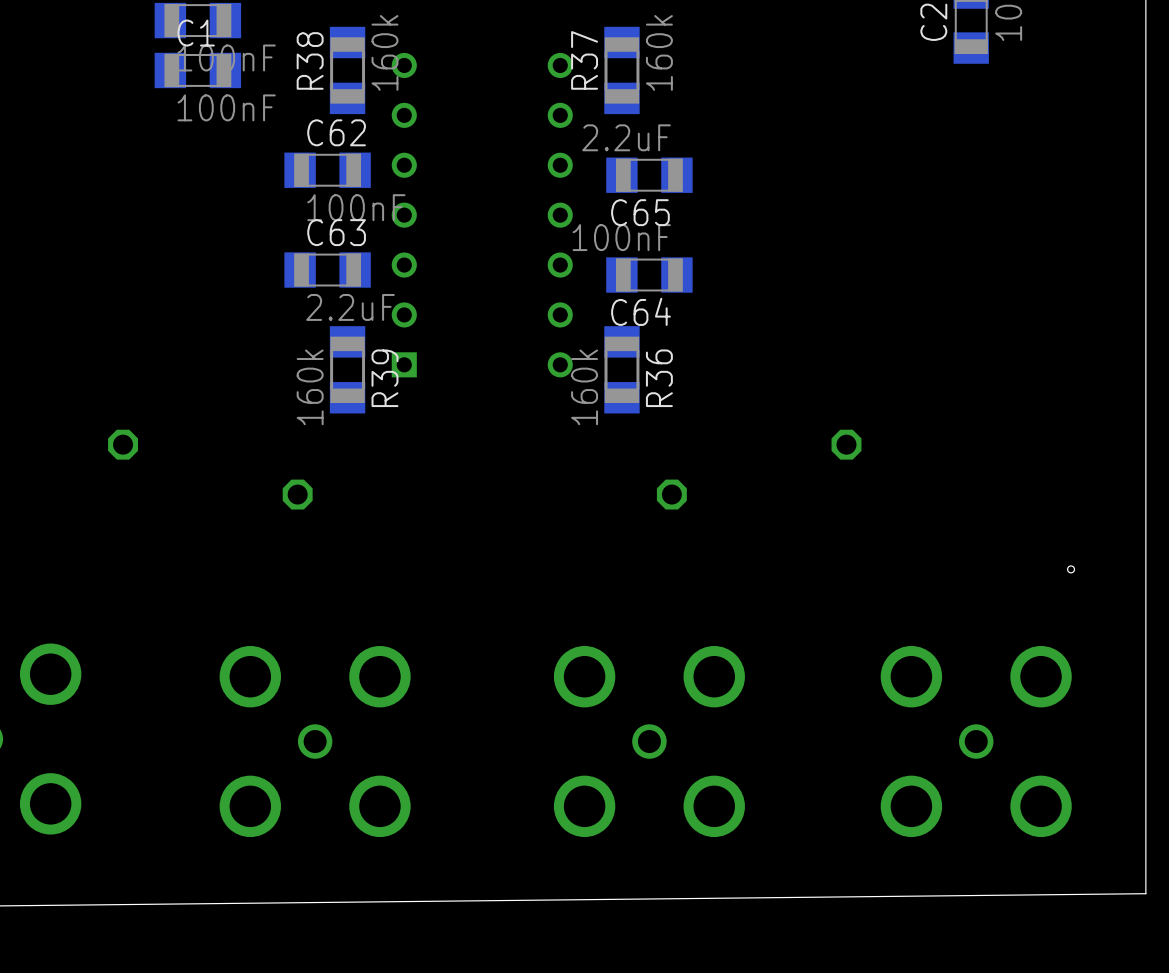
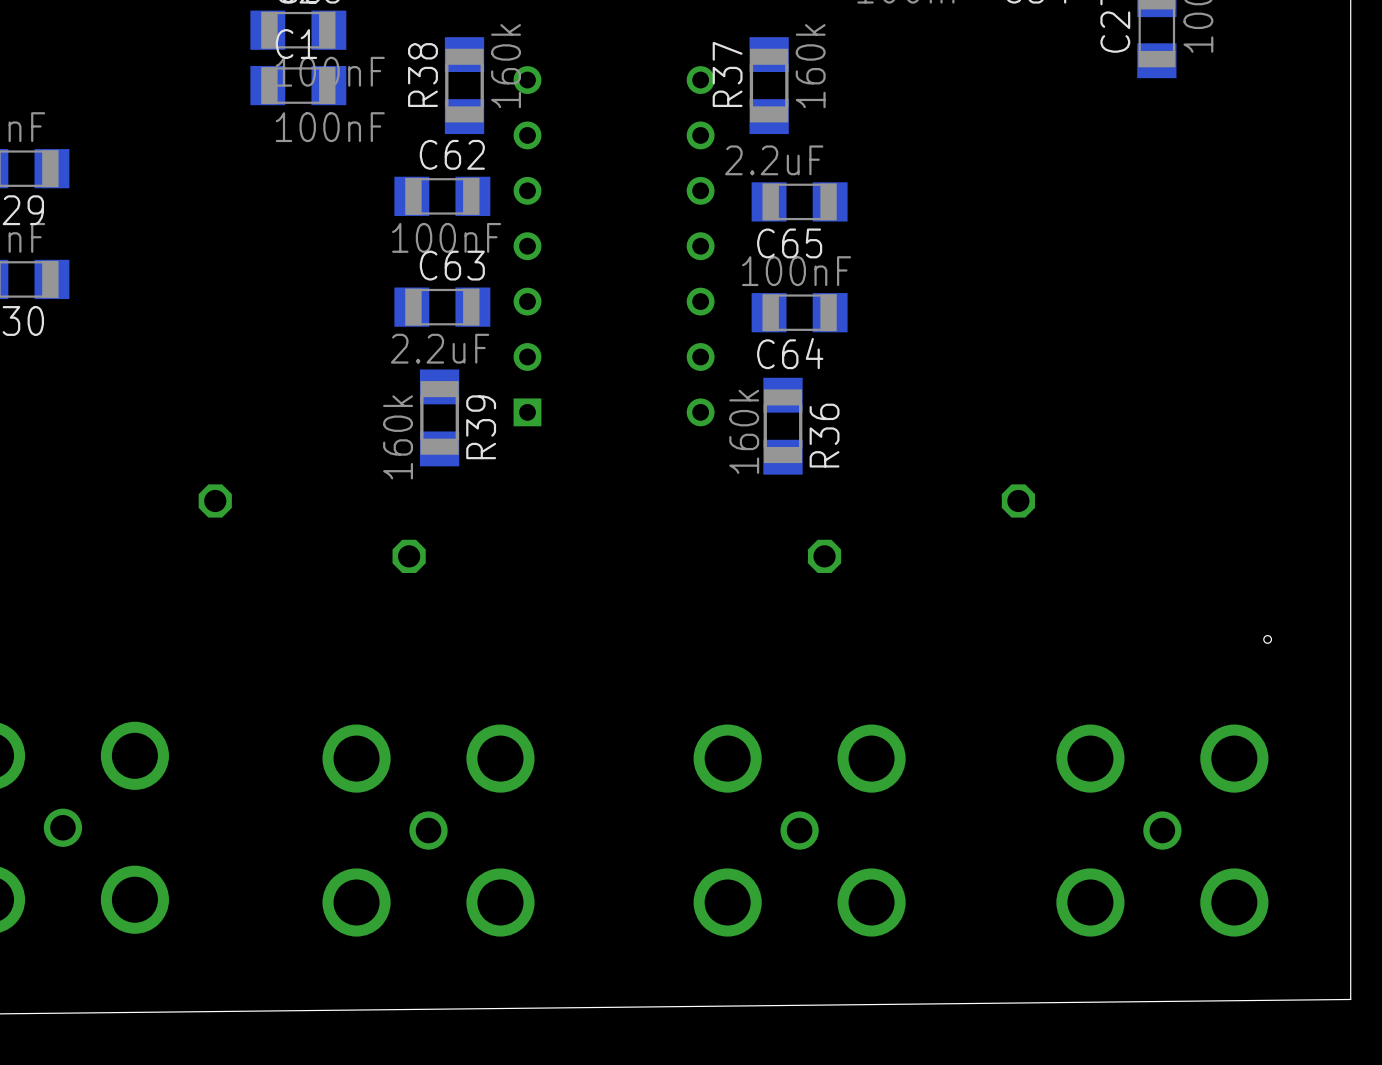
C62 value position: 100nF (356, 207) -> 100nF (446, 237)
C64 value position: 100nF (621, 237) -> 100nF (796, 271)
C63 value position: 2.2uF (350, 307) -> 2.2uF (440, 348)
R39 position: (347, 369) -> (439, 417)
R36 position: (621, 369) -> (782, 426)
R36 value position: 160k (584, 387) -> 160k (744, 431)

